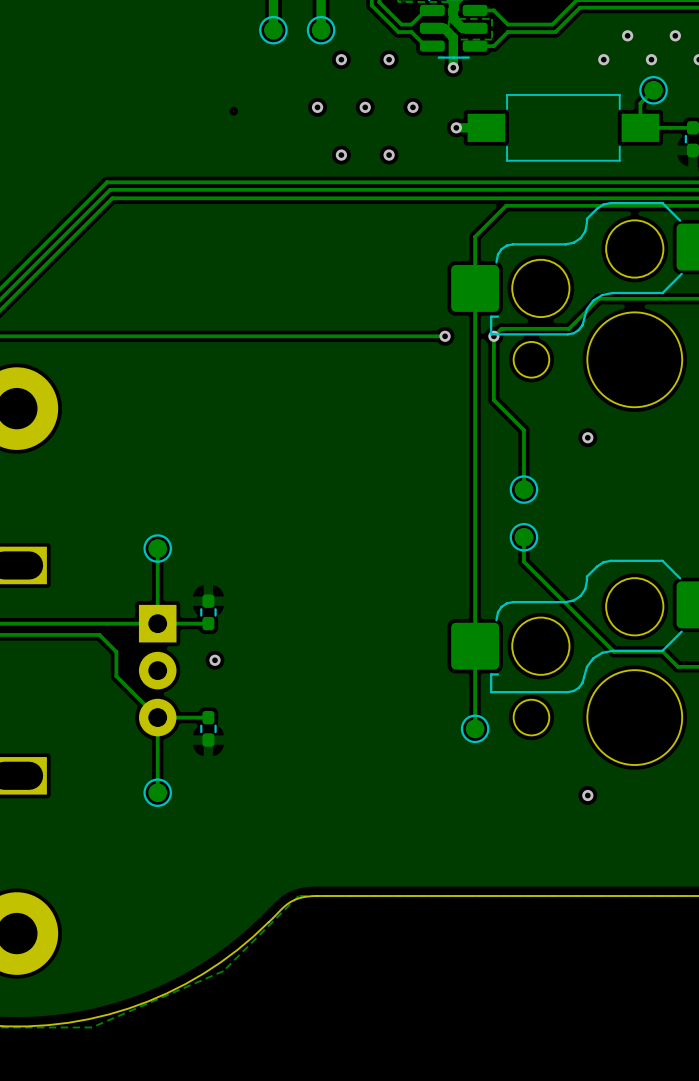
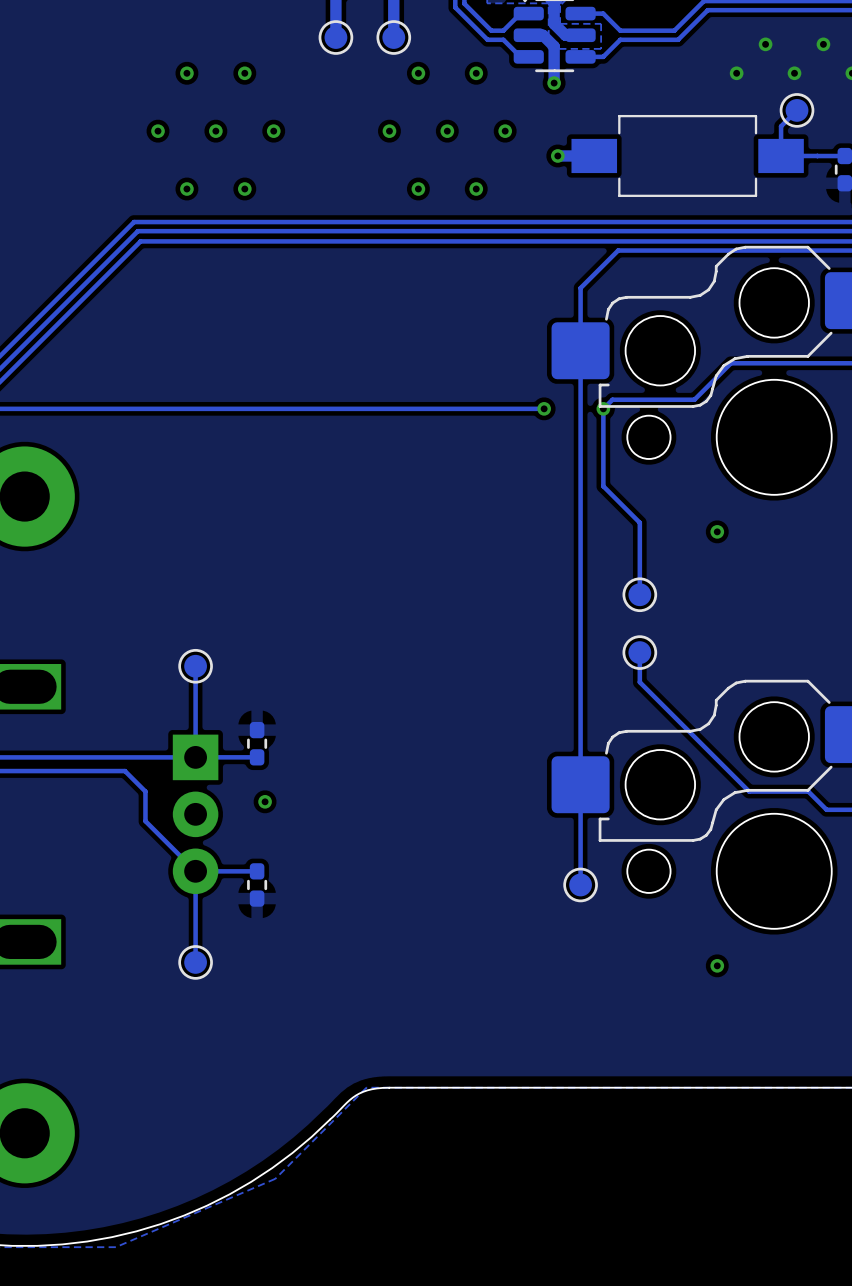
via: none -> (186, 73)
via: none -> (244, 73)
via: none -> (158, 131)
via: none -> (215, 131)
via: none -> (273, 131)
via: none -> (186, 189)
via: none -> (244, 189)

